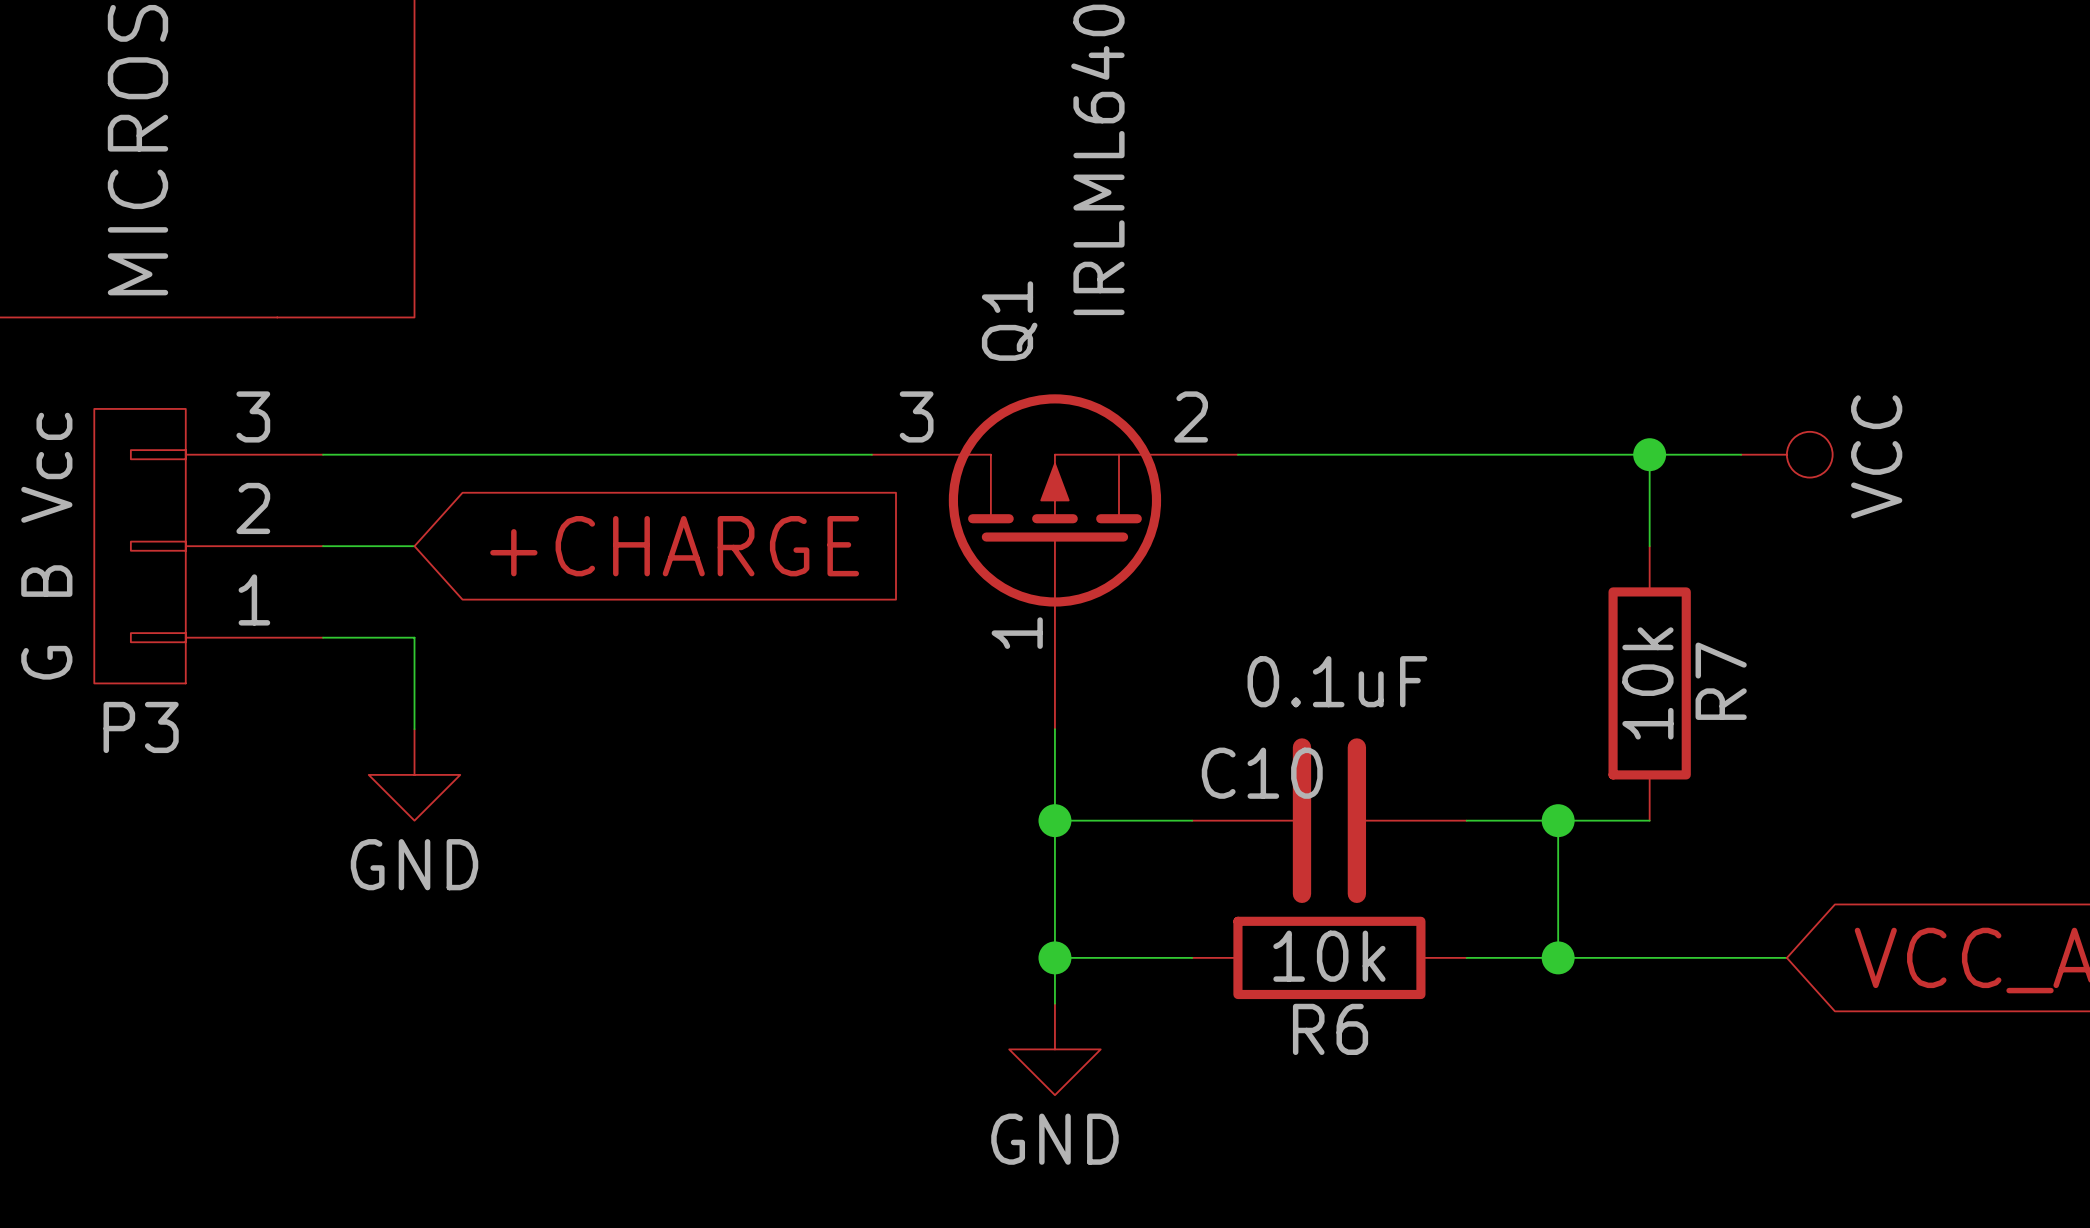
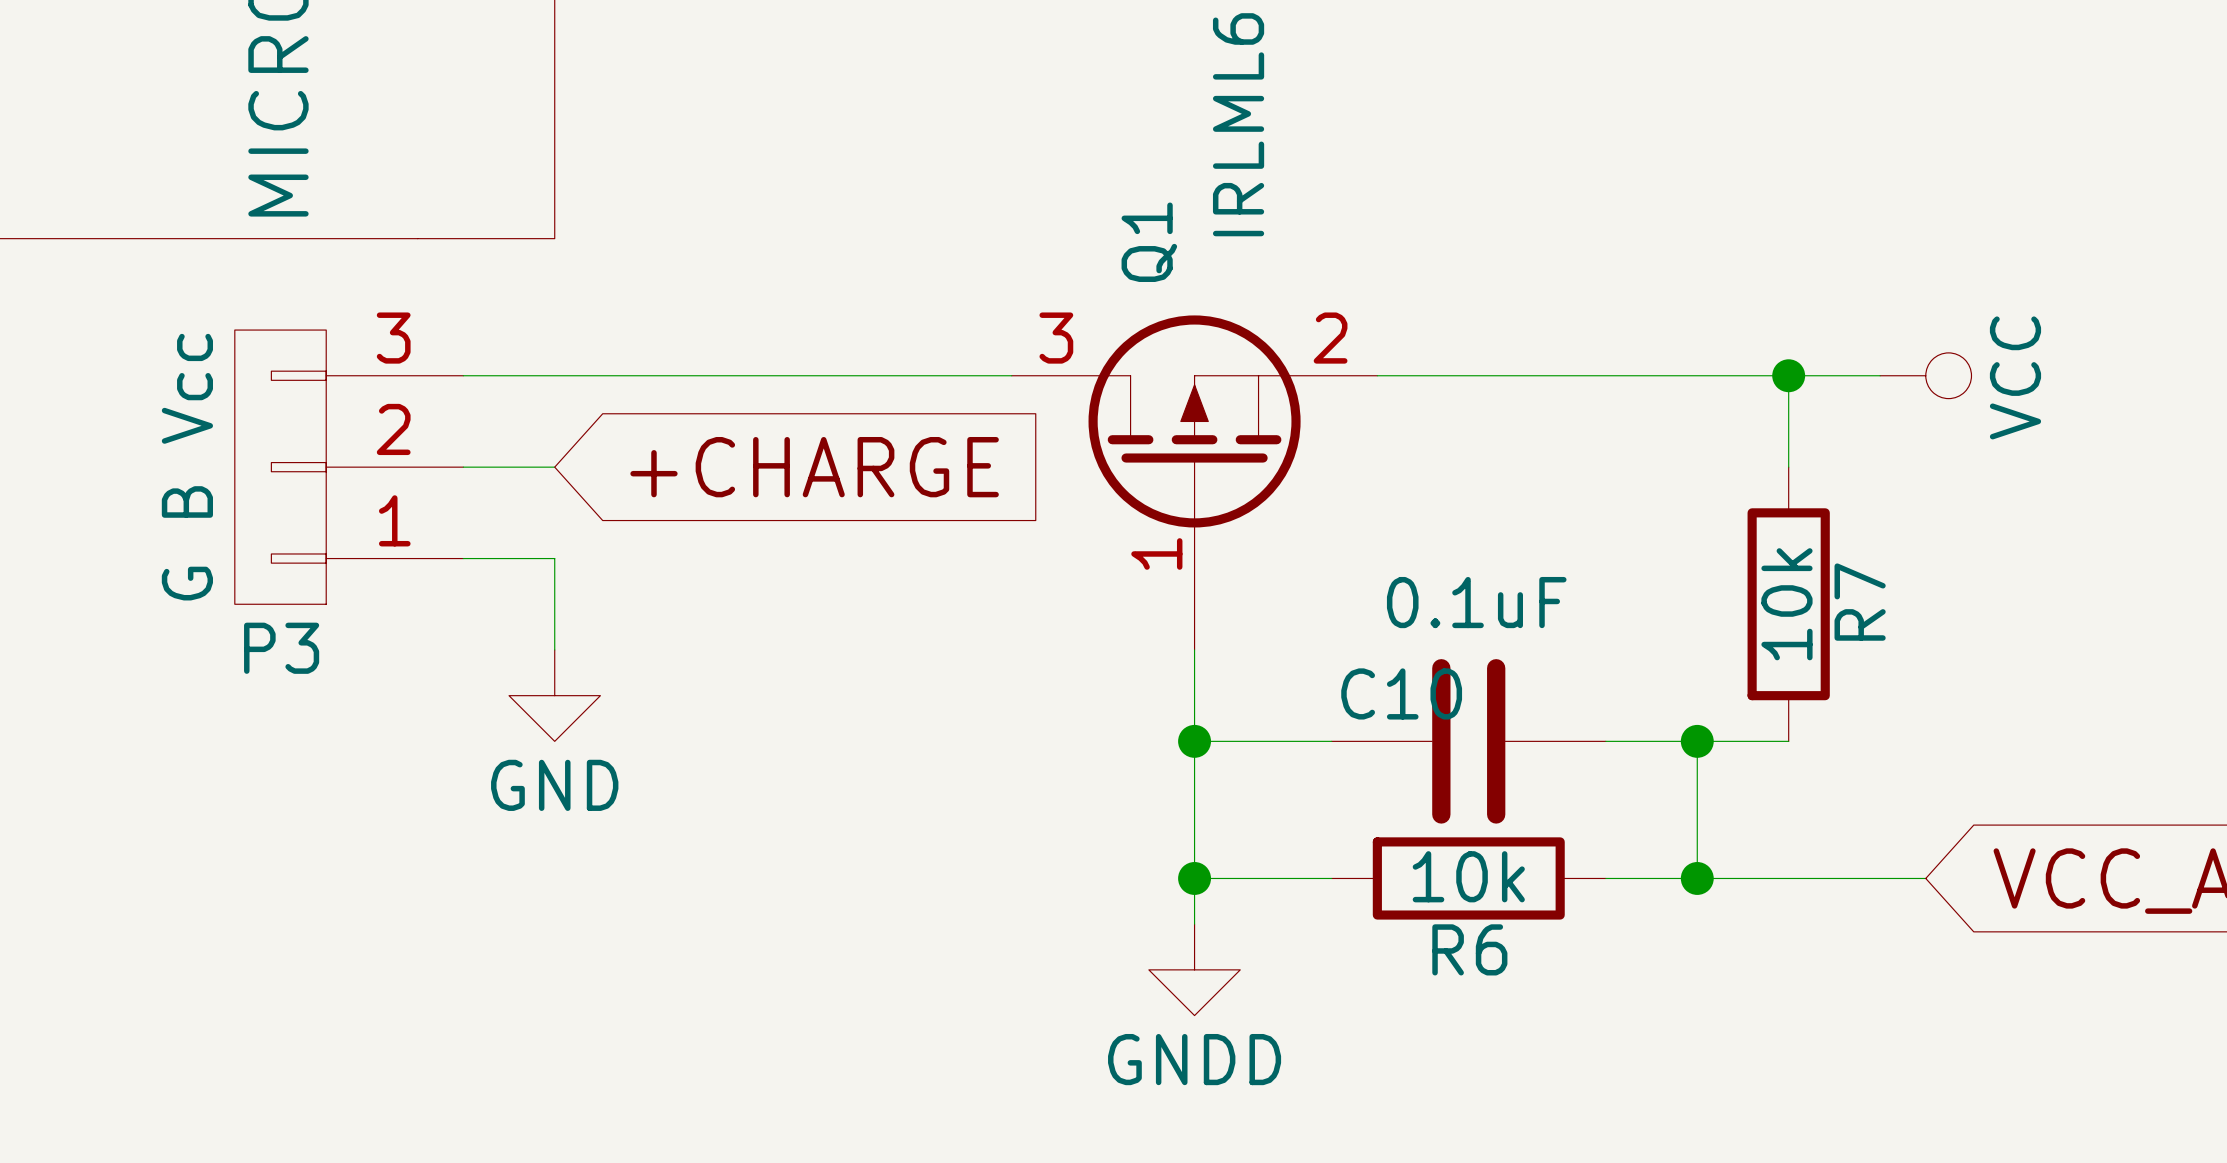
power symbol: GND (1054, 1049) -> GNDD (1194, 969)

